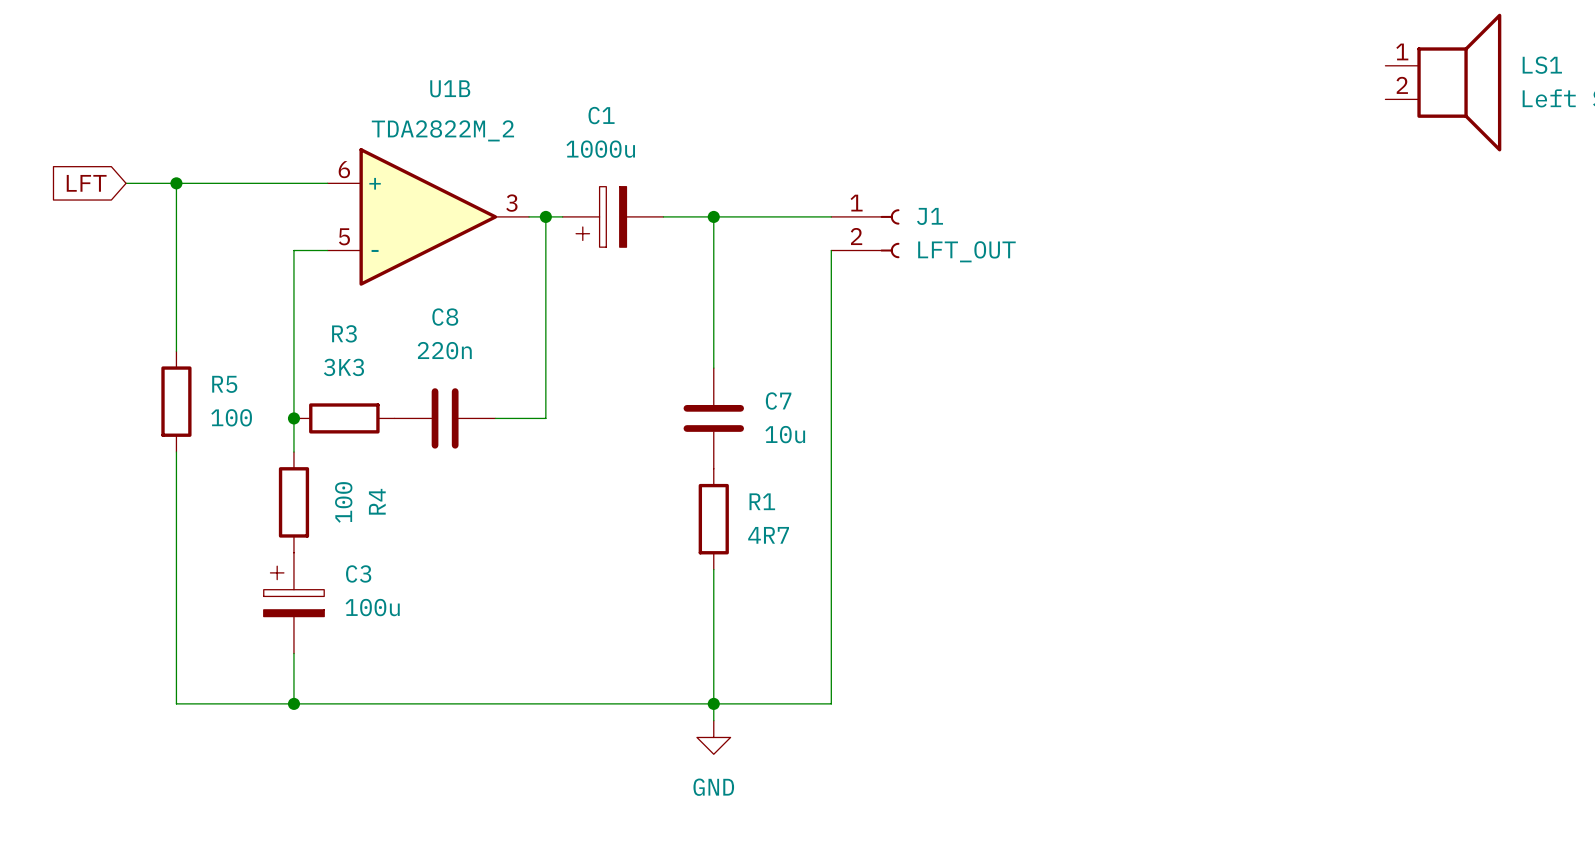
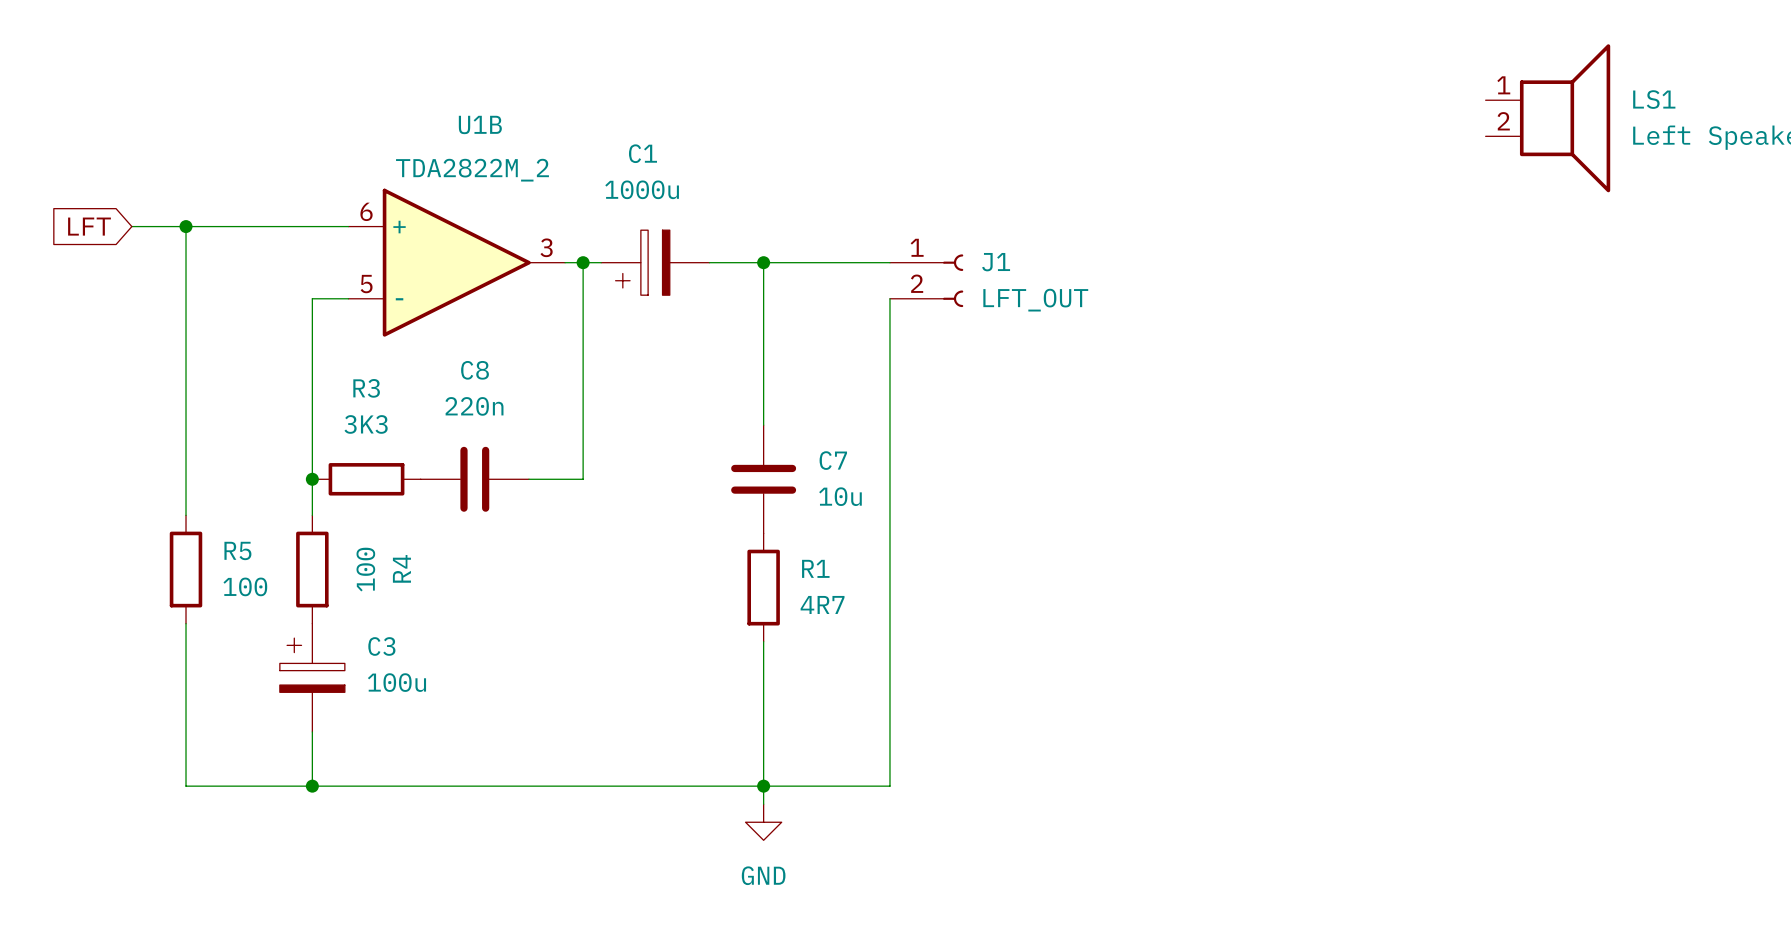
R5 position: (176, 401) -> (186, 569)
wire: (176, 452) (176, 552) -> (186, 515) (186, 407)

